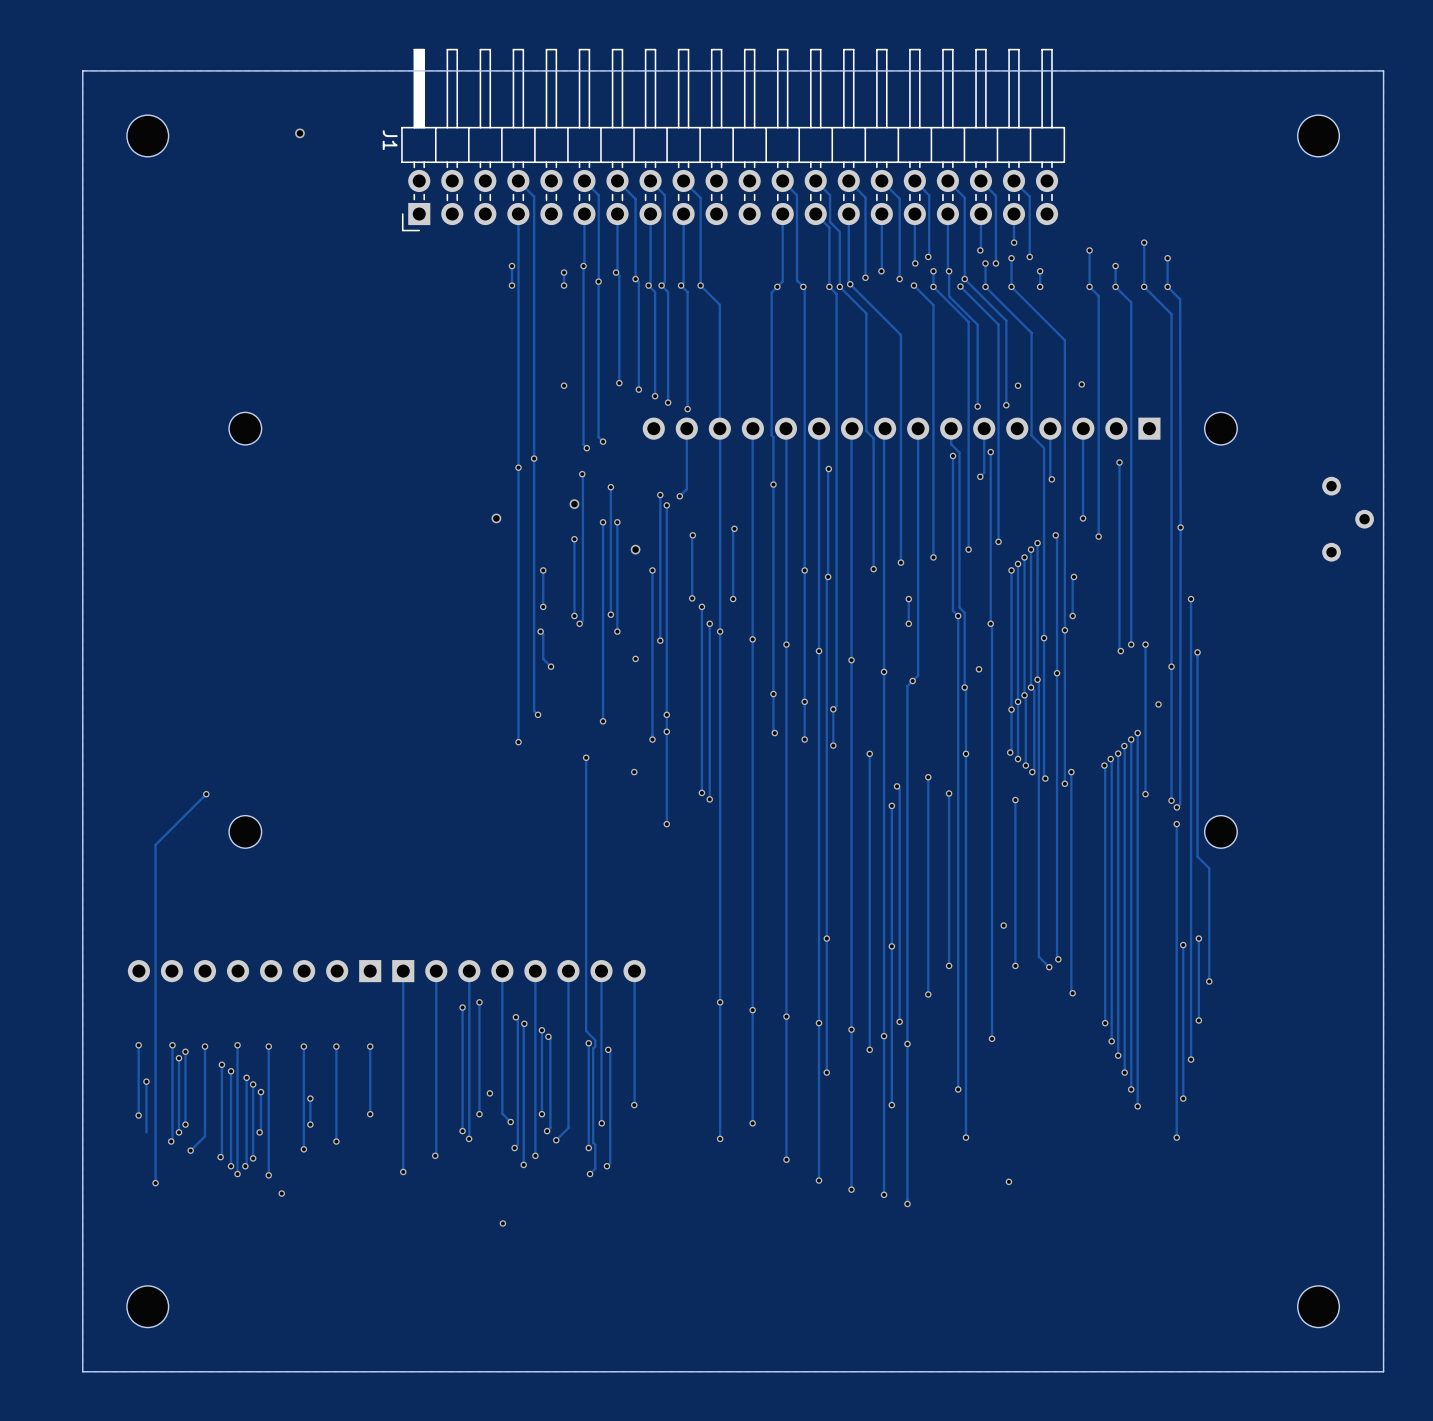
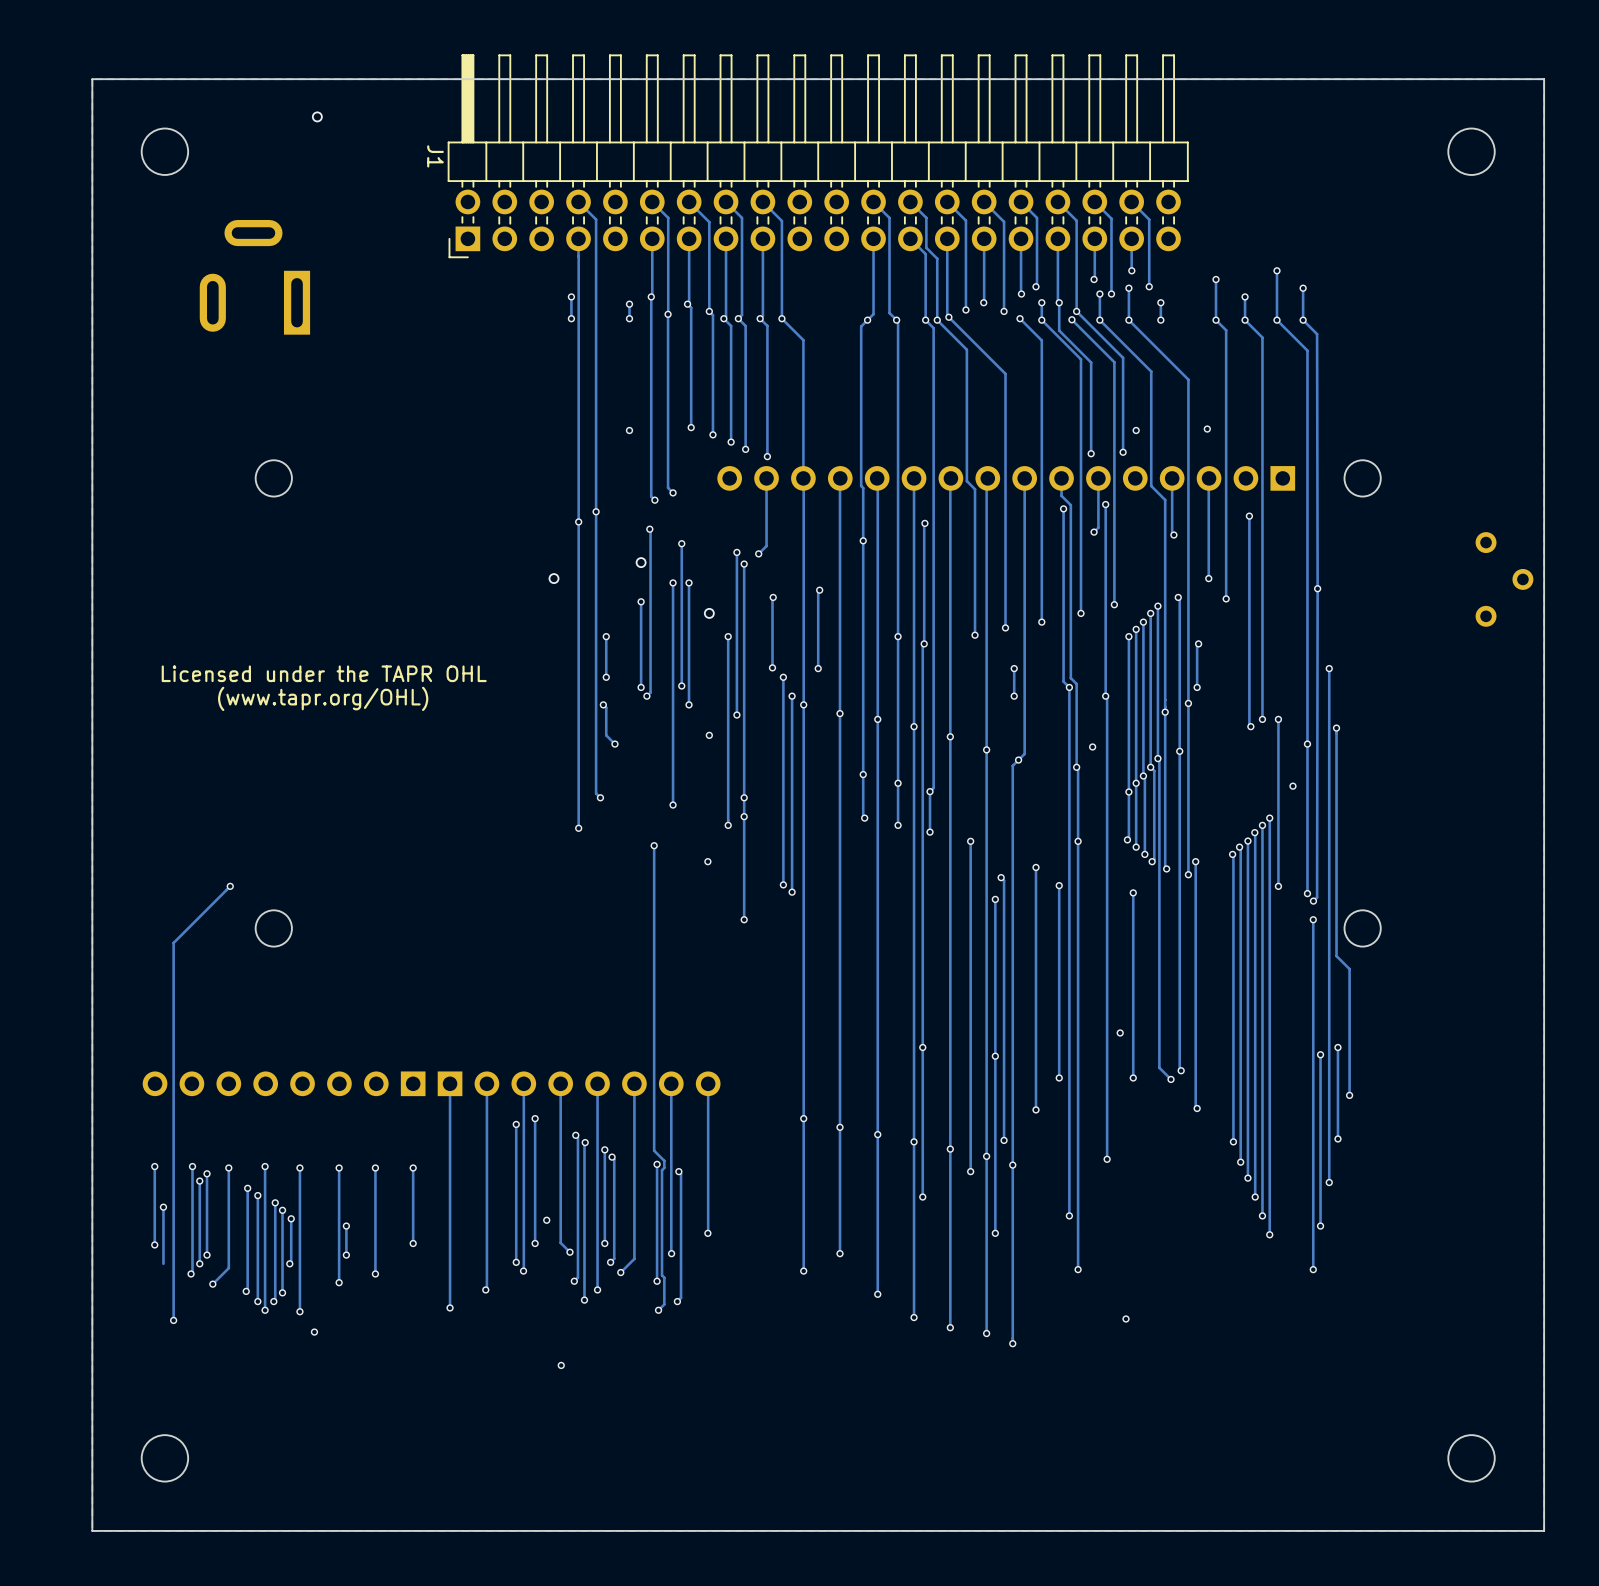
via position: (299, 133) -> (317, 116)
part: none -> (254, 277)
text: none -> Licensed under the TAPR OHL (324, 673)
text: none -> (www.tapr.org/OHL) (323, 698)

